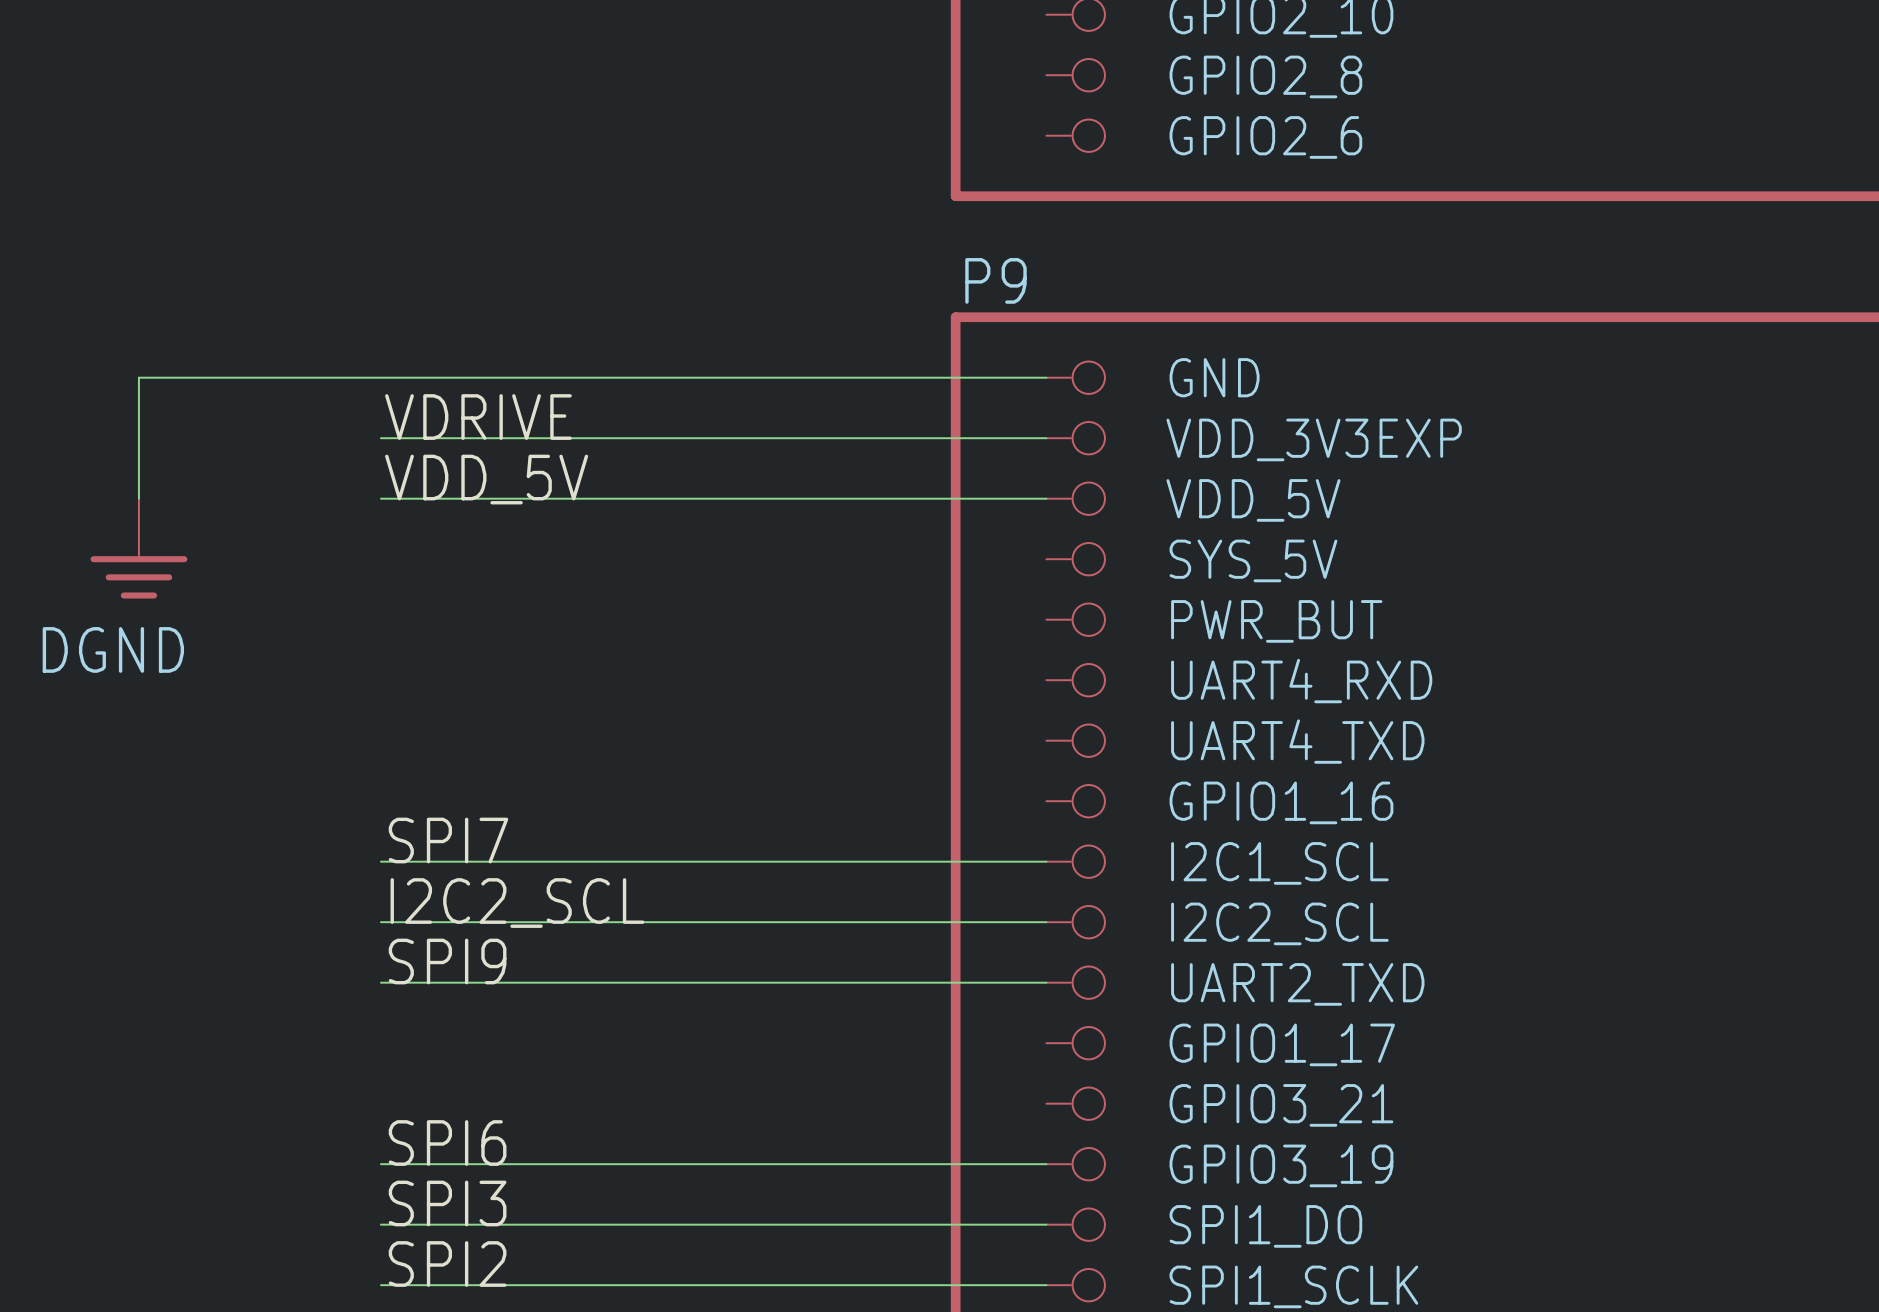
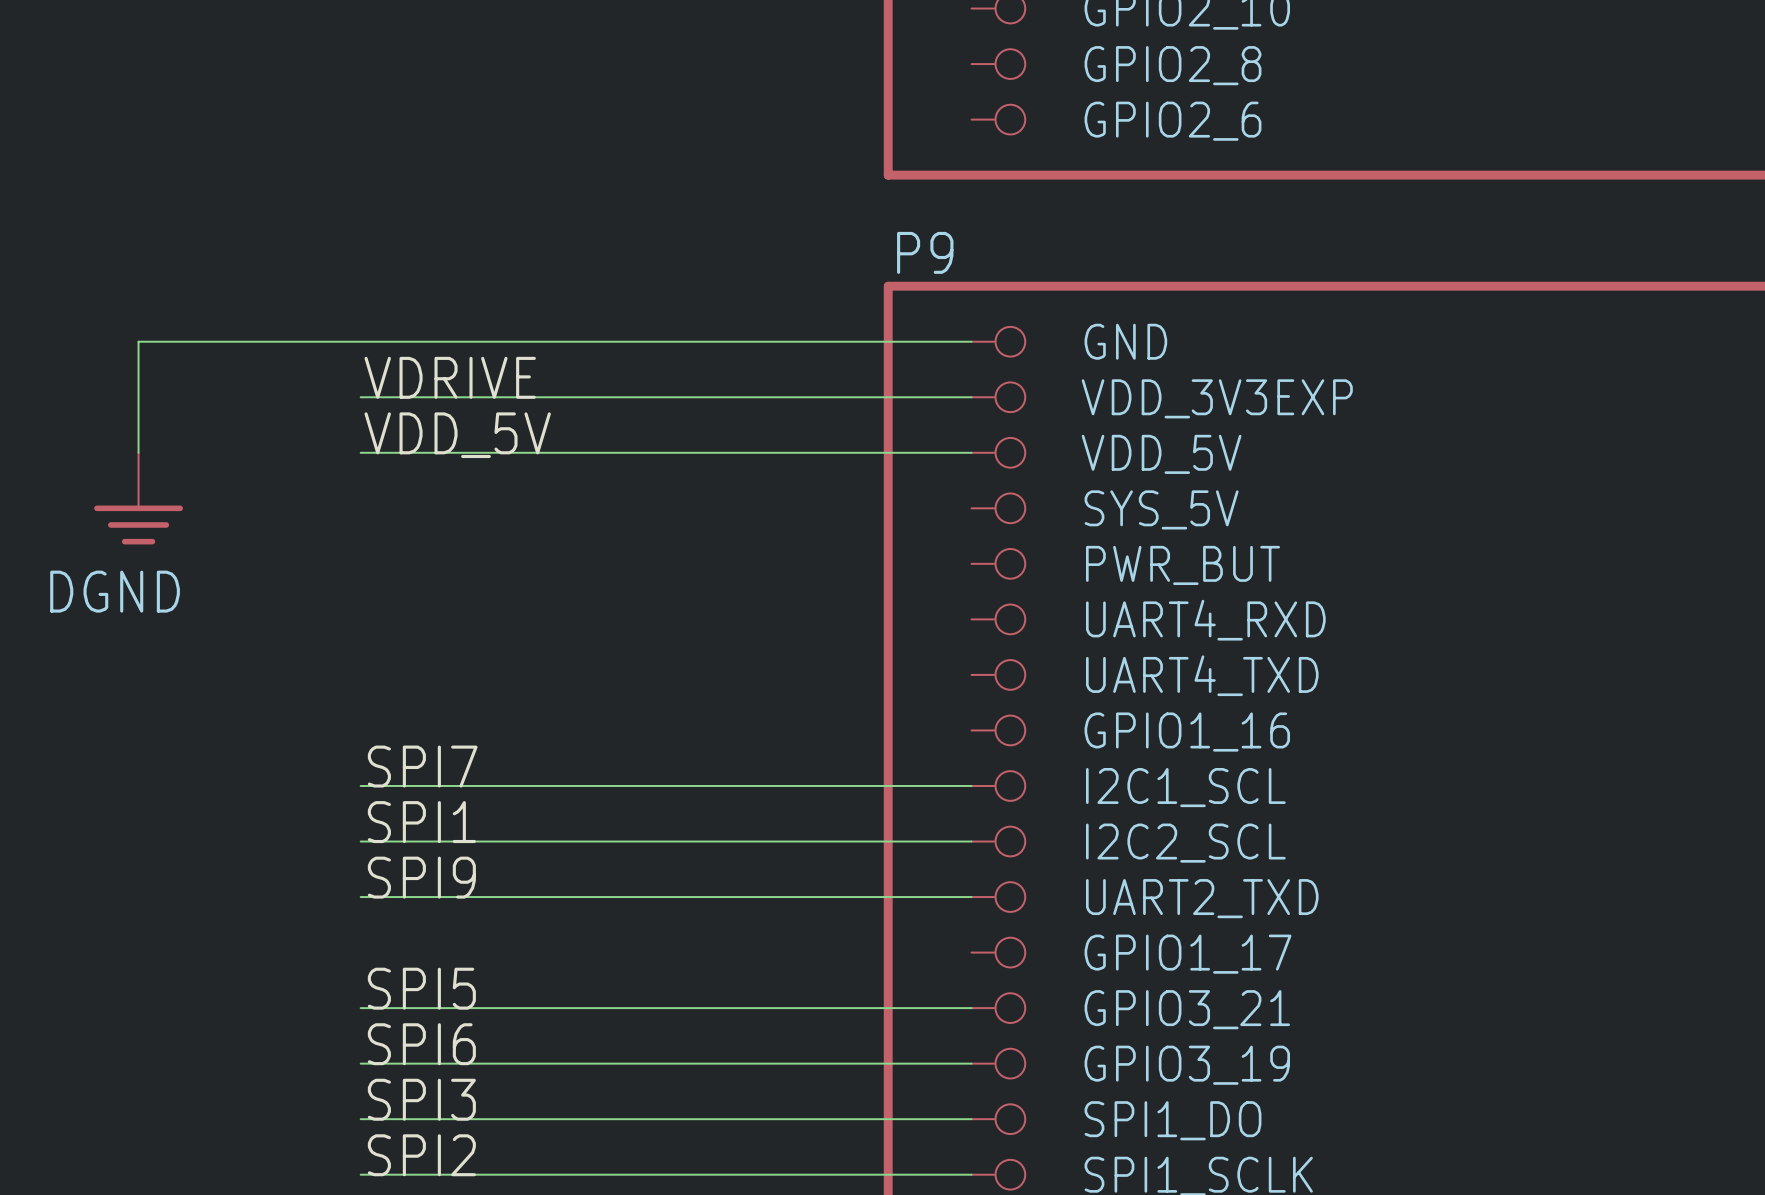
label: I2C2_SCL (517, 903) -> SPI1 (421, 822)
label: none -> SPI5 (421, 988)
wire: none -> (360, 1008) (971, 1008)

